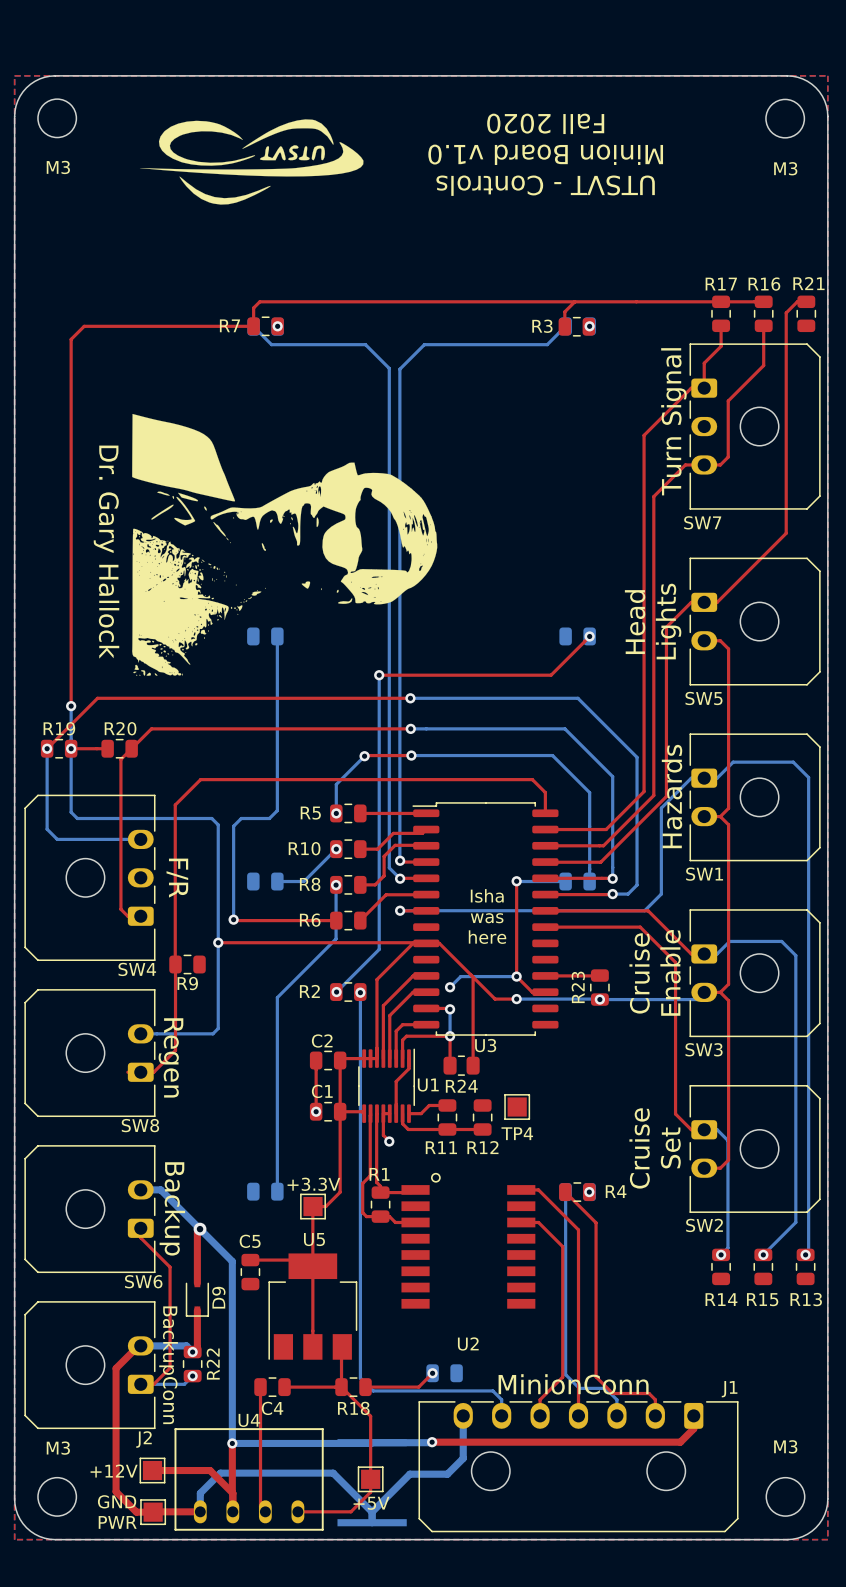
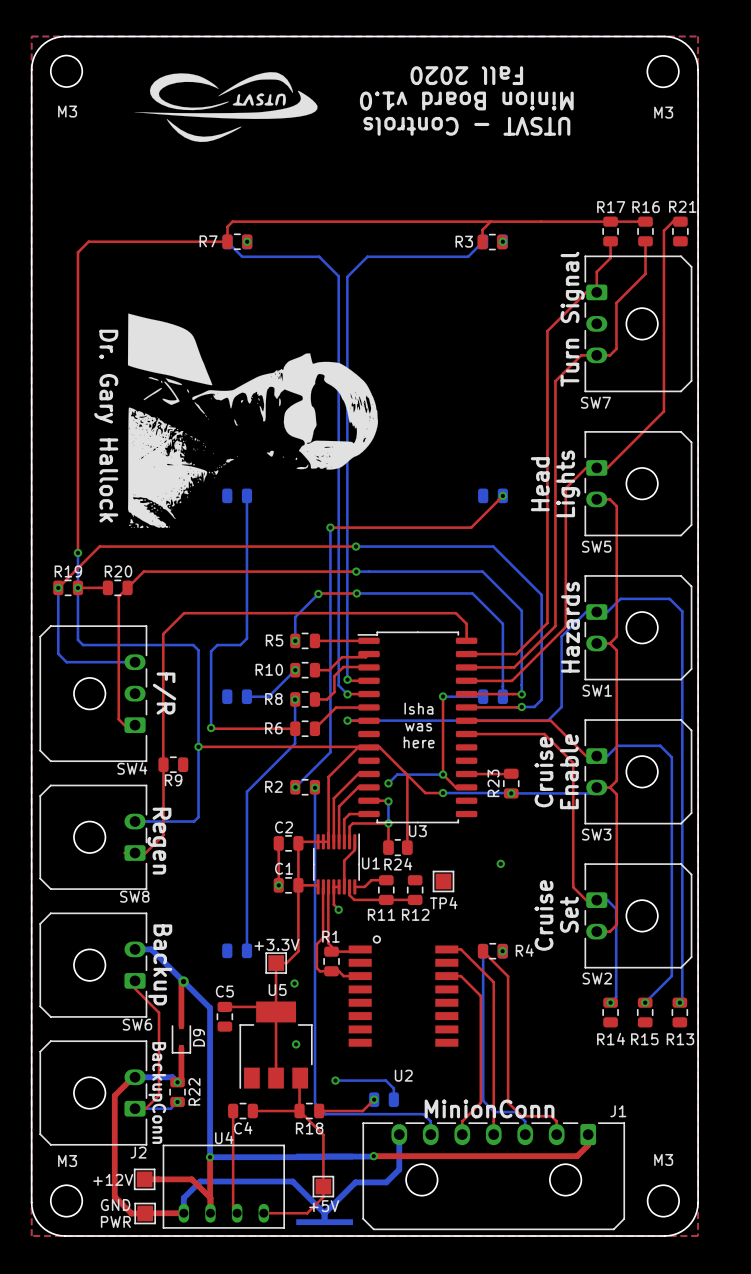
via: none -> (500, 863)
via: none -> (294, 983)
via: none -> (296, 1044)
bottom track: none -> (335, 1080) (385, 1080) (393, 1088) (393, 1099)
via: none -> (335, 1080)

